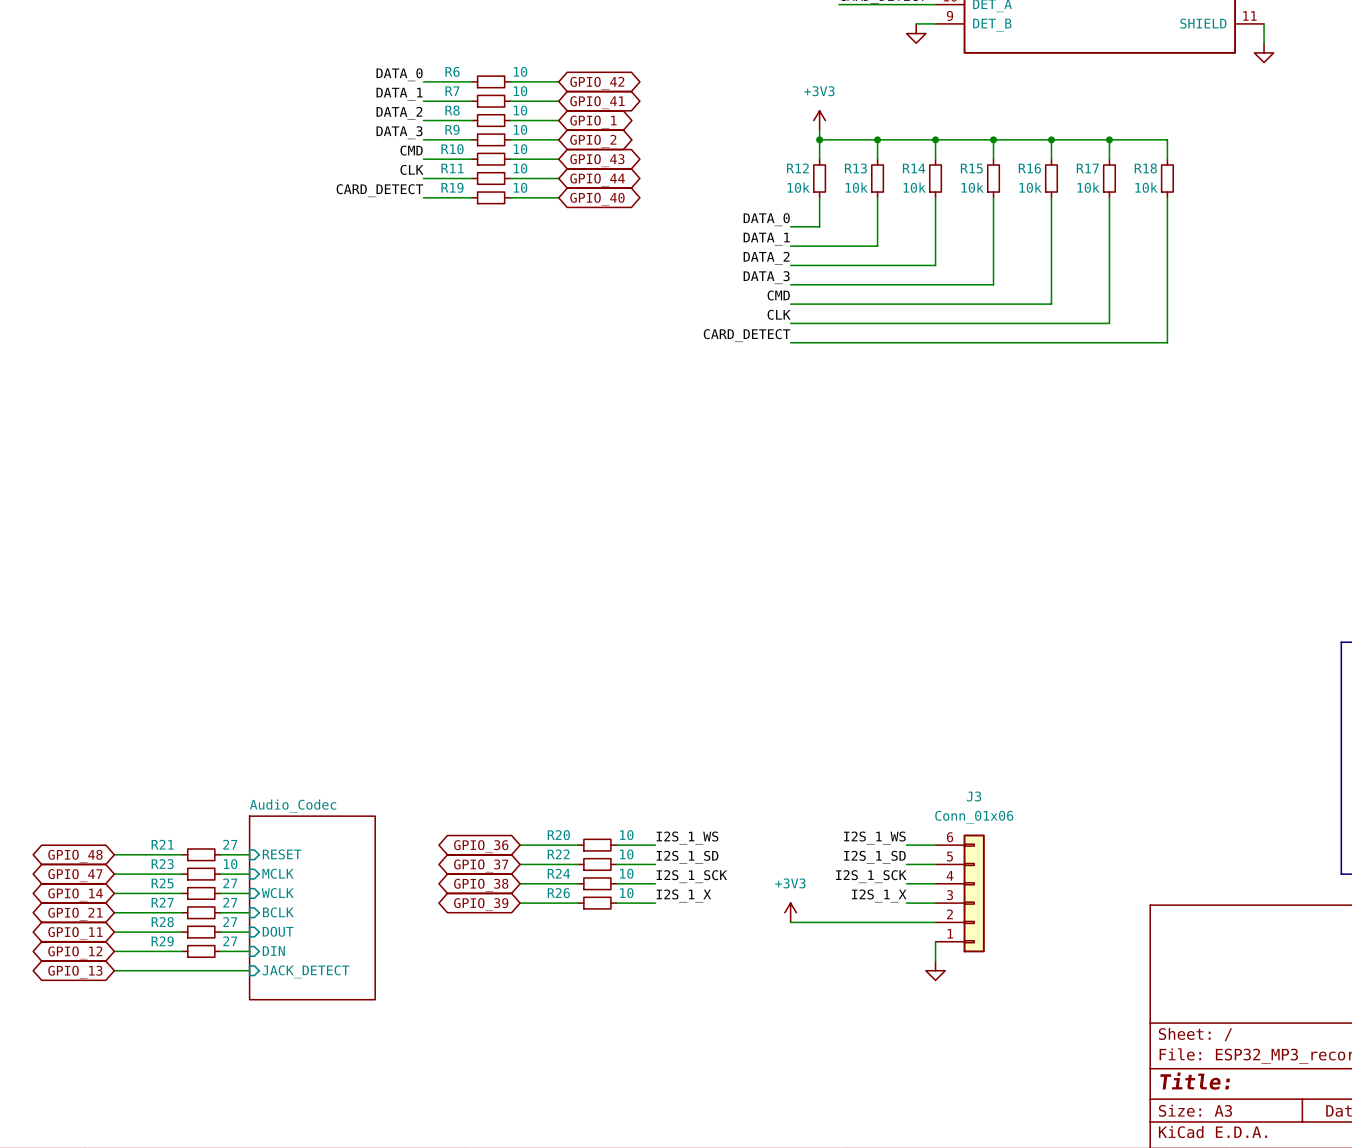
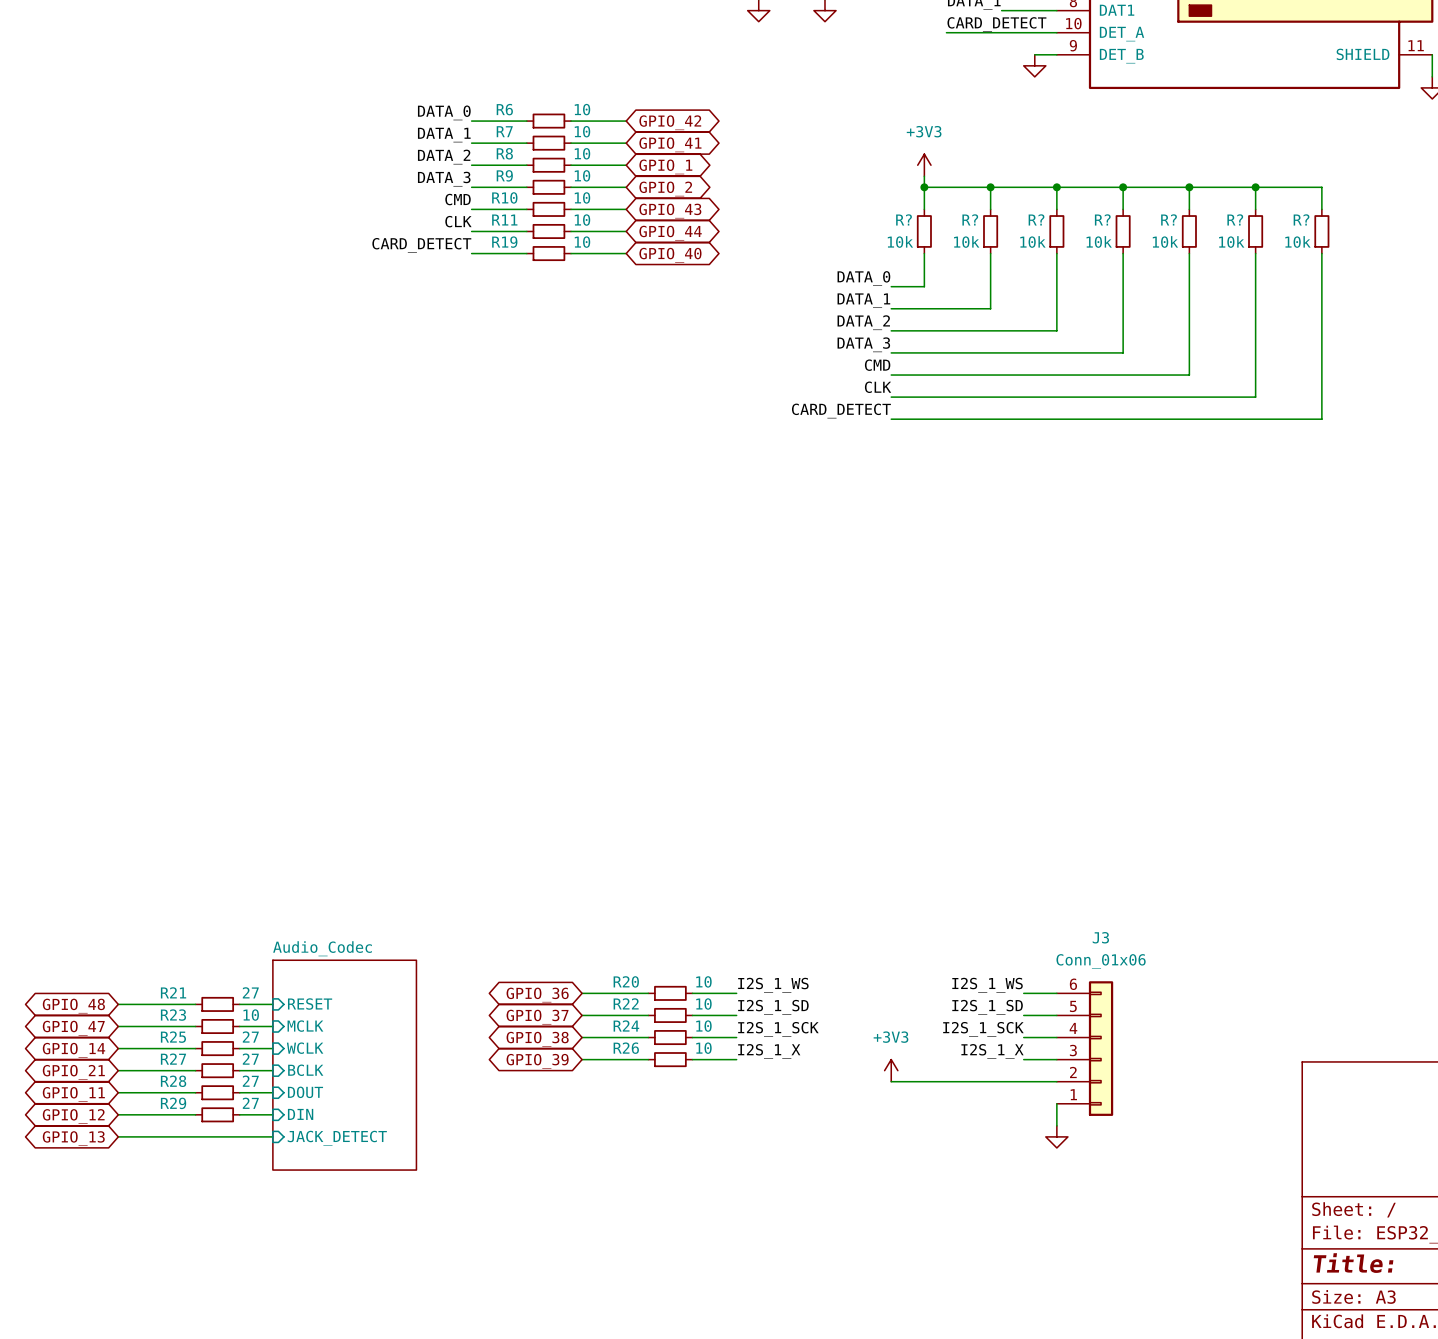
R12 name: R12 (797, 168) -> R? (904, 219)
R13 name: R13 (855, 168) -> R? (970, 219)
R14 name: R14 (914, 168) -> R? (1036, 219)
R15 name: R15 (971, 168) -> R? (1102, 219)
R16 name: R16 (1029, 168) -> R? (1169, 219)
R17 name: R17 (1087, 168) -> R? (1235, 219)
R18 name: R18 (1145, 168) -> R? (1301, 219)

